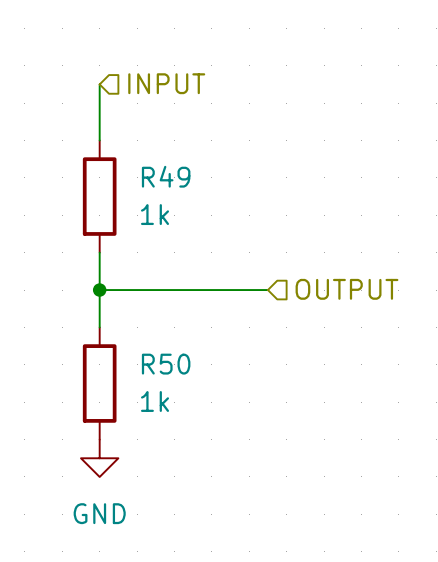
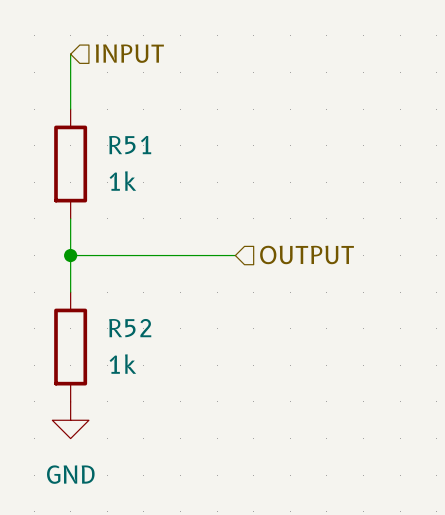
R49 name: R49 (166, 176) -> R51 (130, 145)
R50 name: R50 (166, 364) -> R52 (130, 328)

